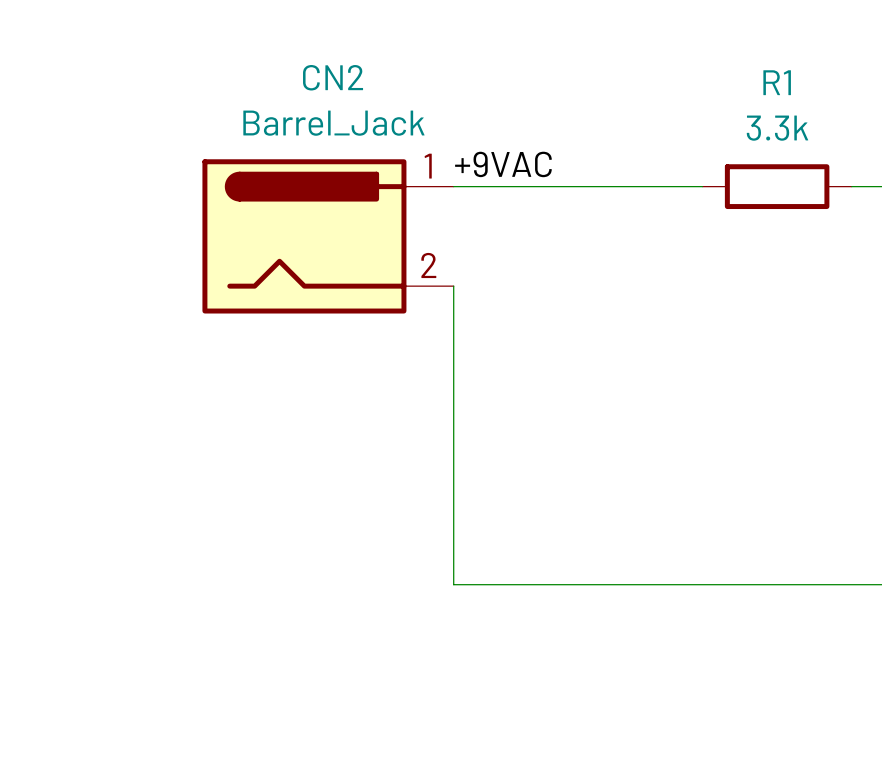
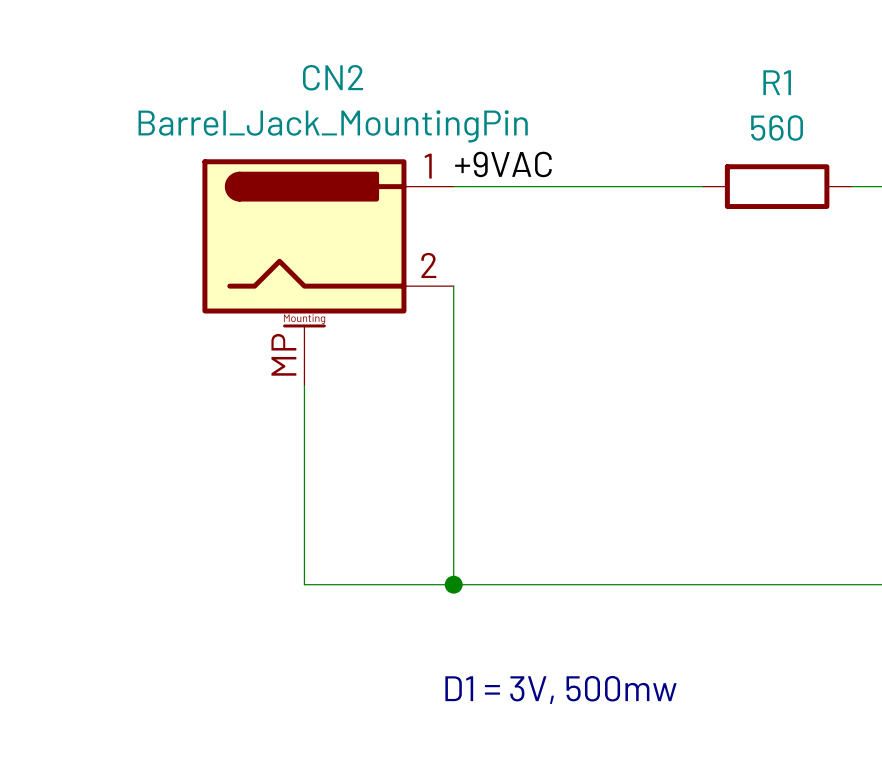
CN2 value: Barrel_Jack (333, 123) -> Barrel_Jack_MountingPin (333, 126)
R1 value: 3.3k (777, 128) -> 560 (777, 128)
CN2 symbol: [202, 159, 454, 314] -> [202, 159, 454, 386]
wire: none -> (304, 385) (304, 584) (453, 584)
junction: none -> (453, 584)
text: none -> D1 = 3V, 500mw (560, 689)

